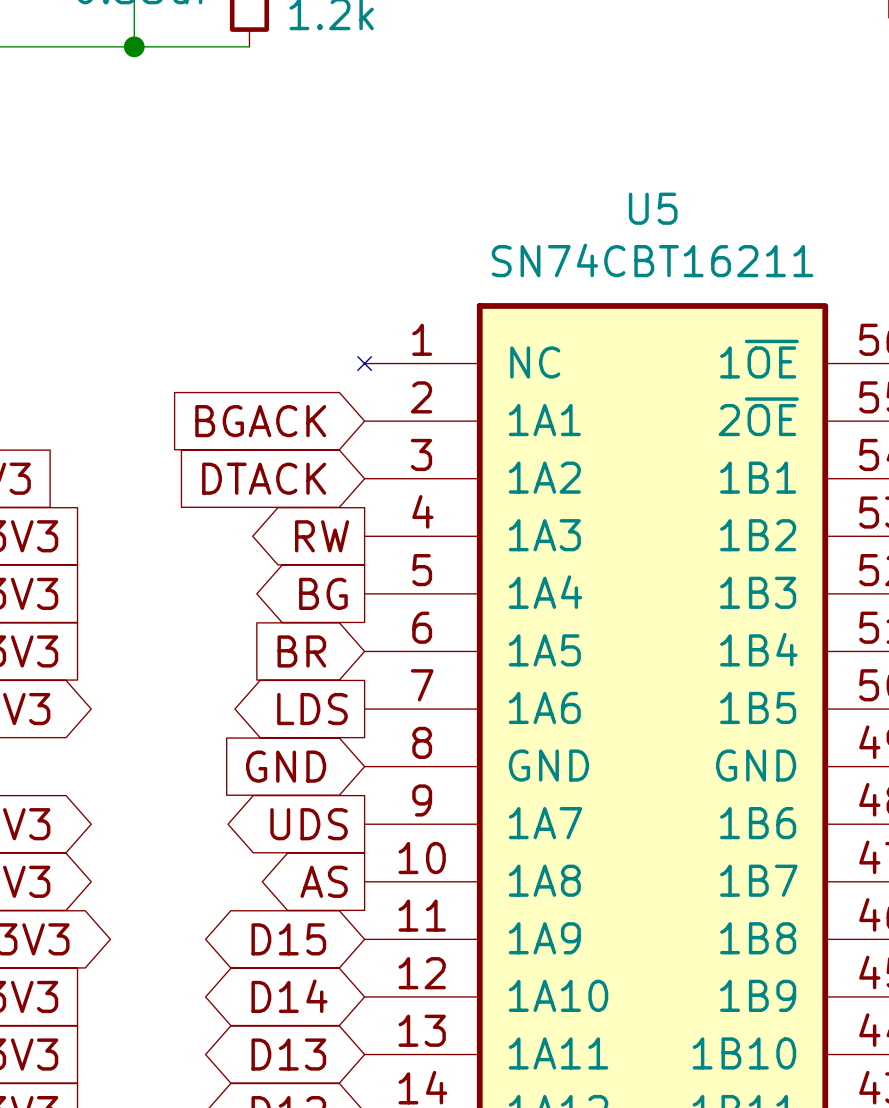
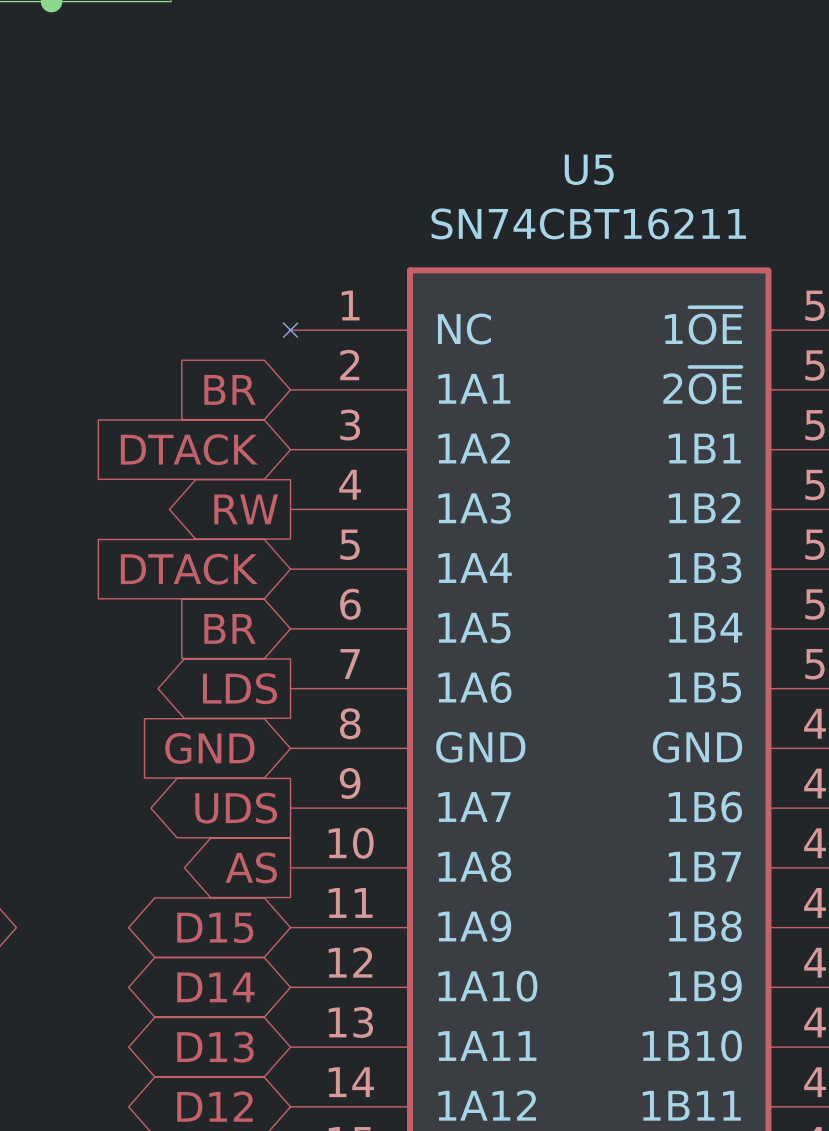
global label: BGACK (260, 421) -> BR (230, 389)
global label shape: output (323, 593) -> input (189, 569)
global label: BG (323, 593) -> DTACK (189, 569)

